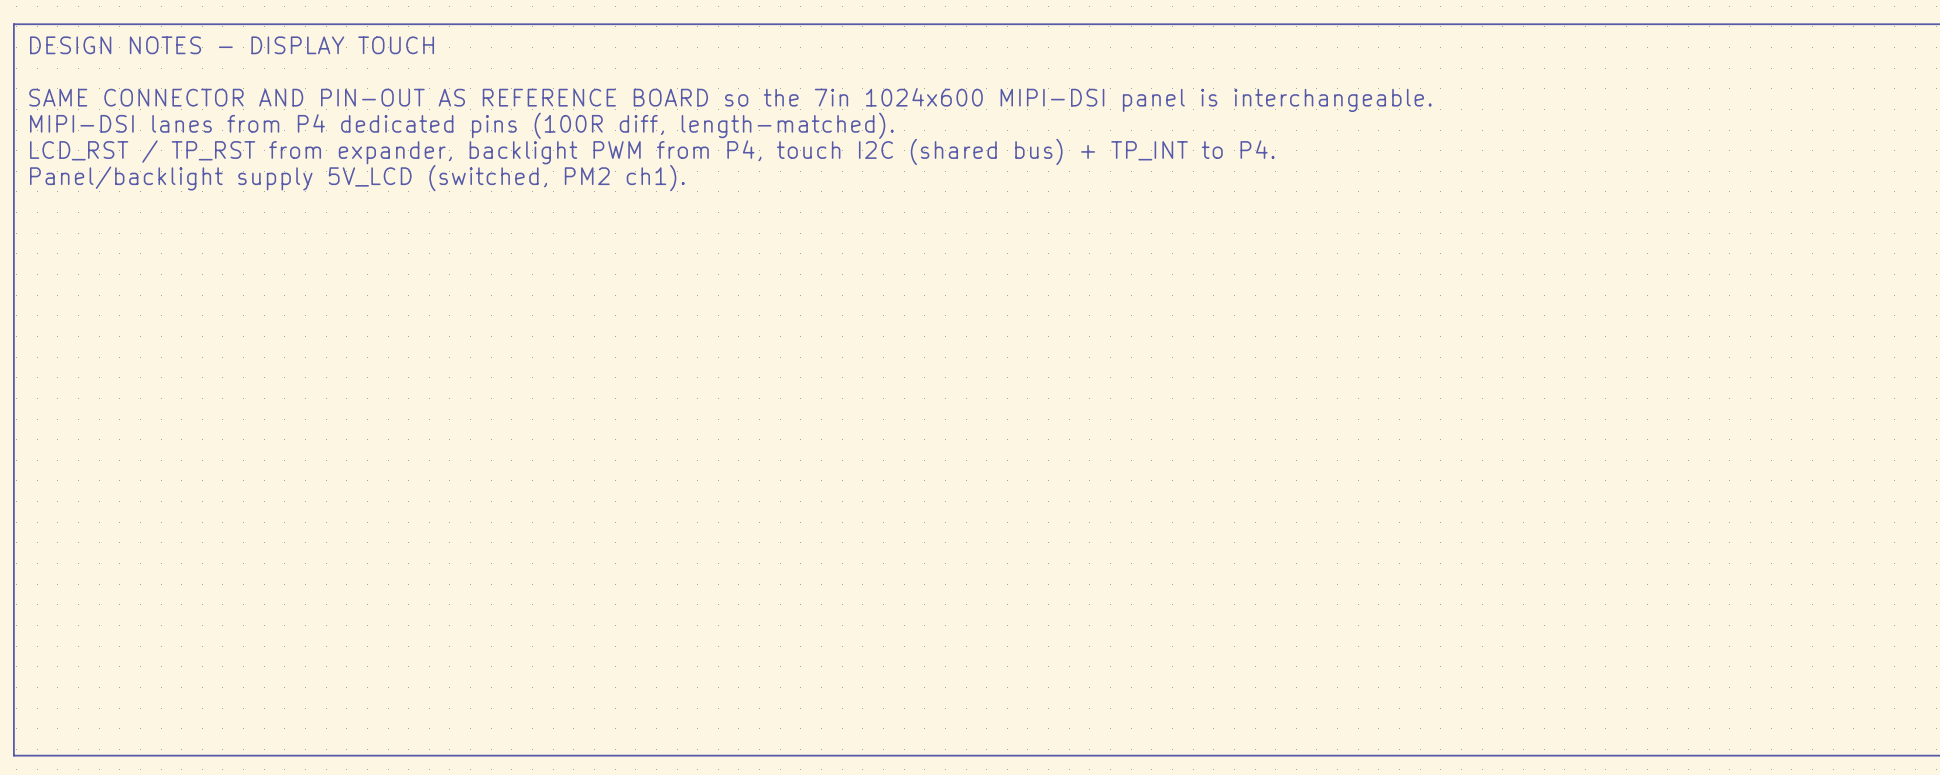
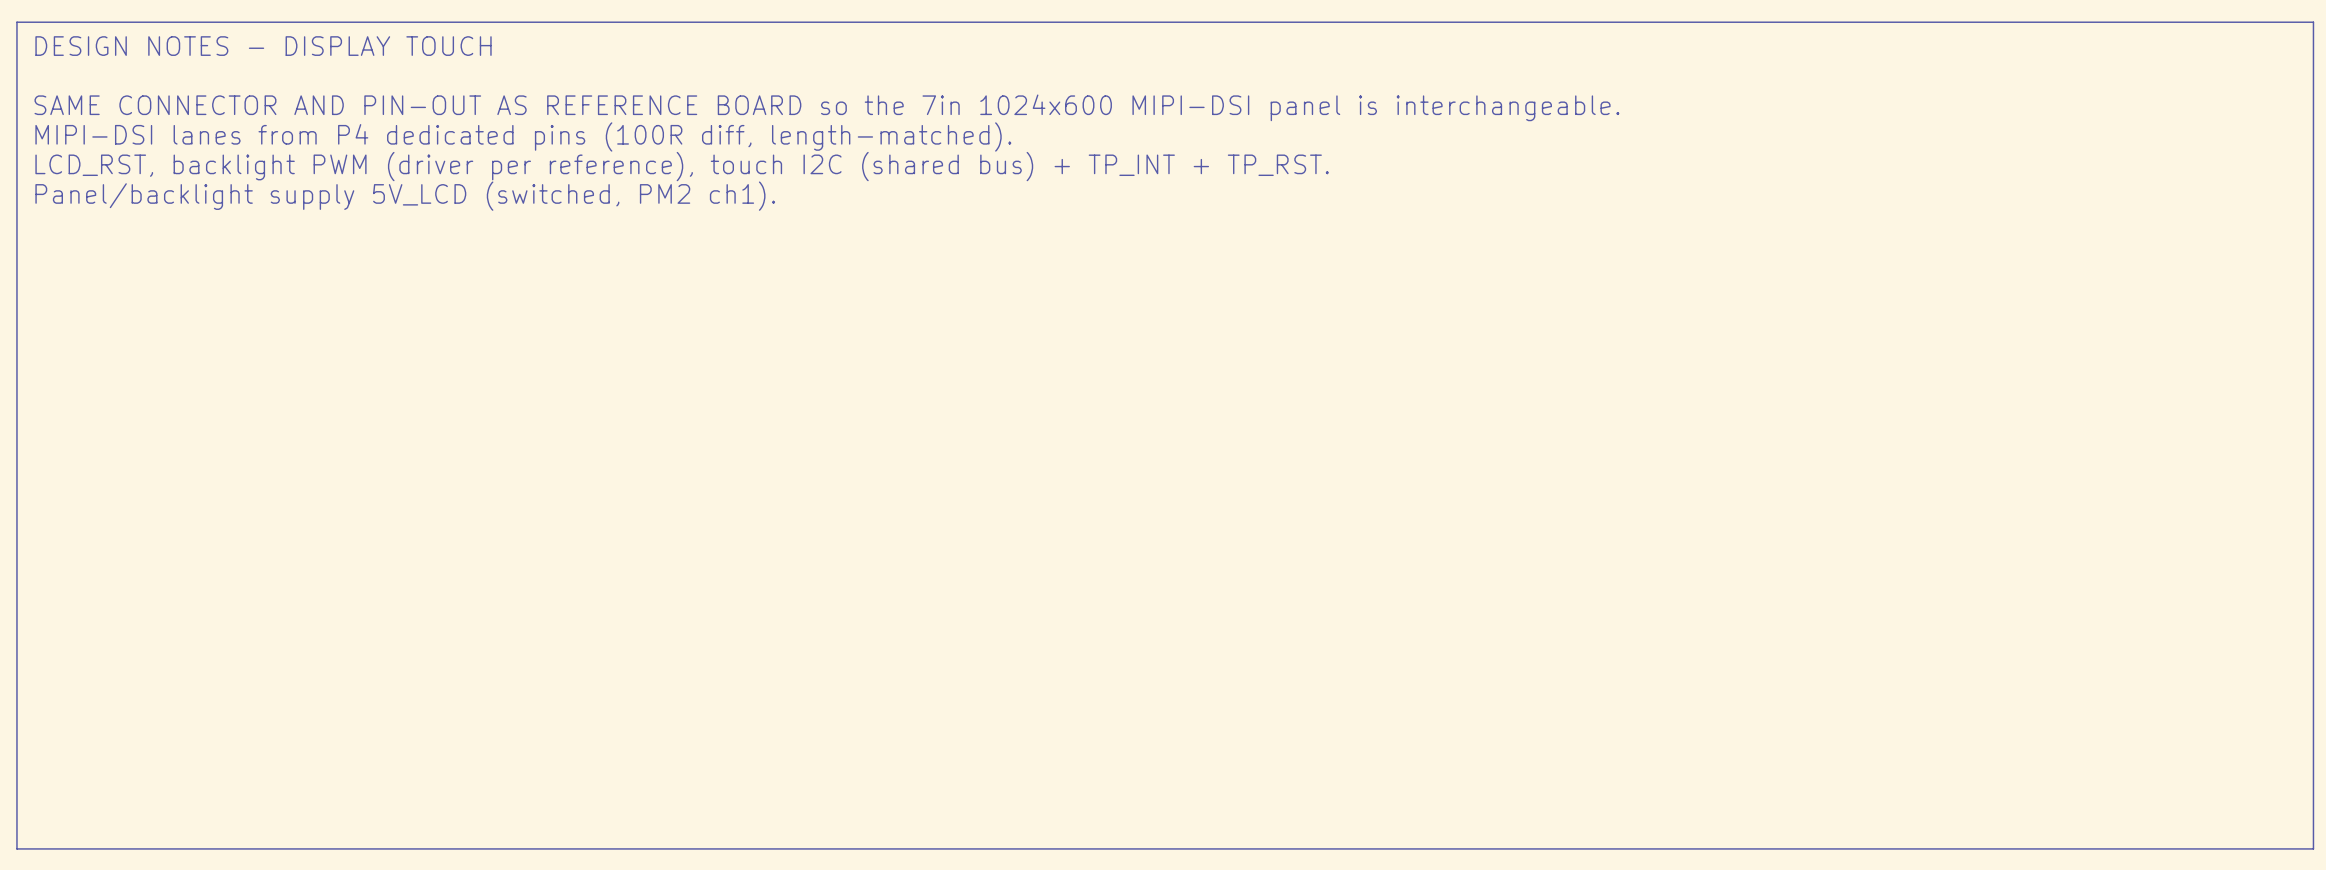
text: LCD_RST / TP_RST from expander, backlight PWM from P4, touch I2C (shared bus) + TP_INT to P4. (652, 151) -> LCD_RST, backlight PWM (driver per reference), touch I2C (shared bus) + TP_INT + TP_RST. (682, 166)

